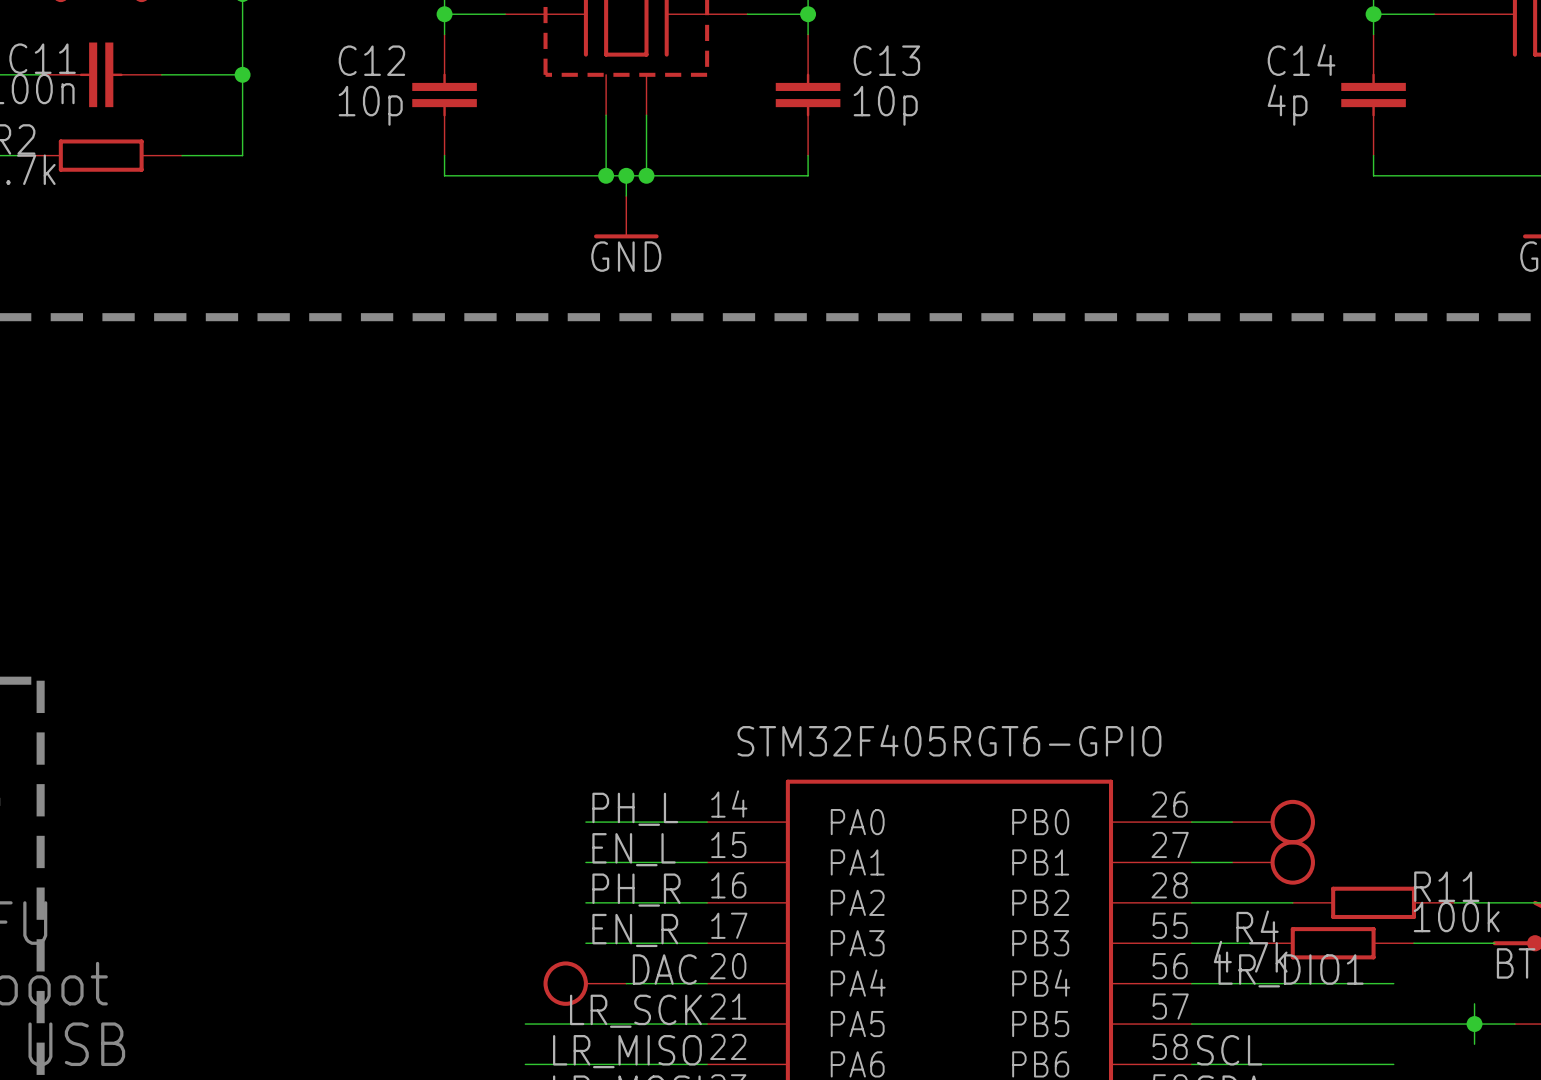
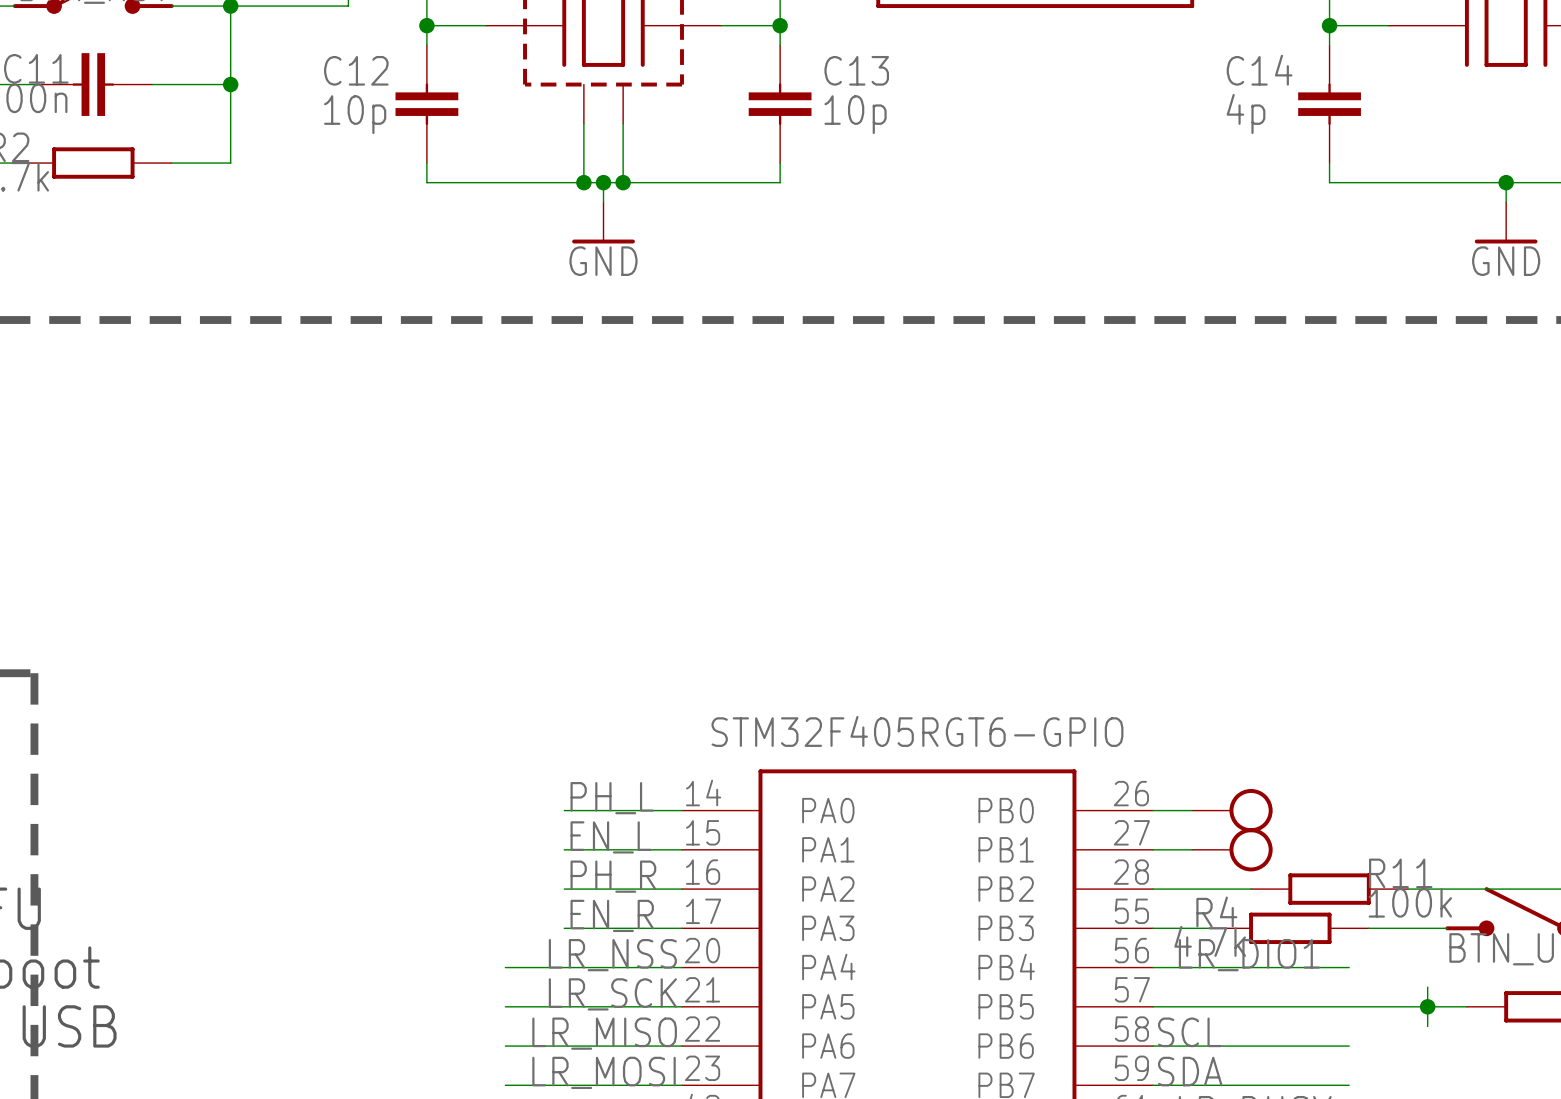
label: DAC (664, 969) -> none
label: none -> LR_NSS (612, 955)
wire: none -> (505, 967) (603, 967)
part: (584, 983) -> none

